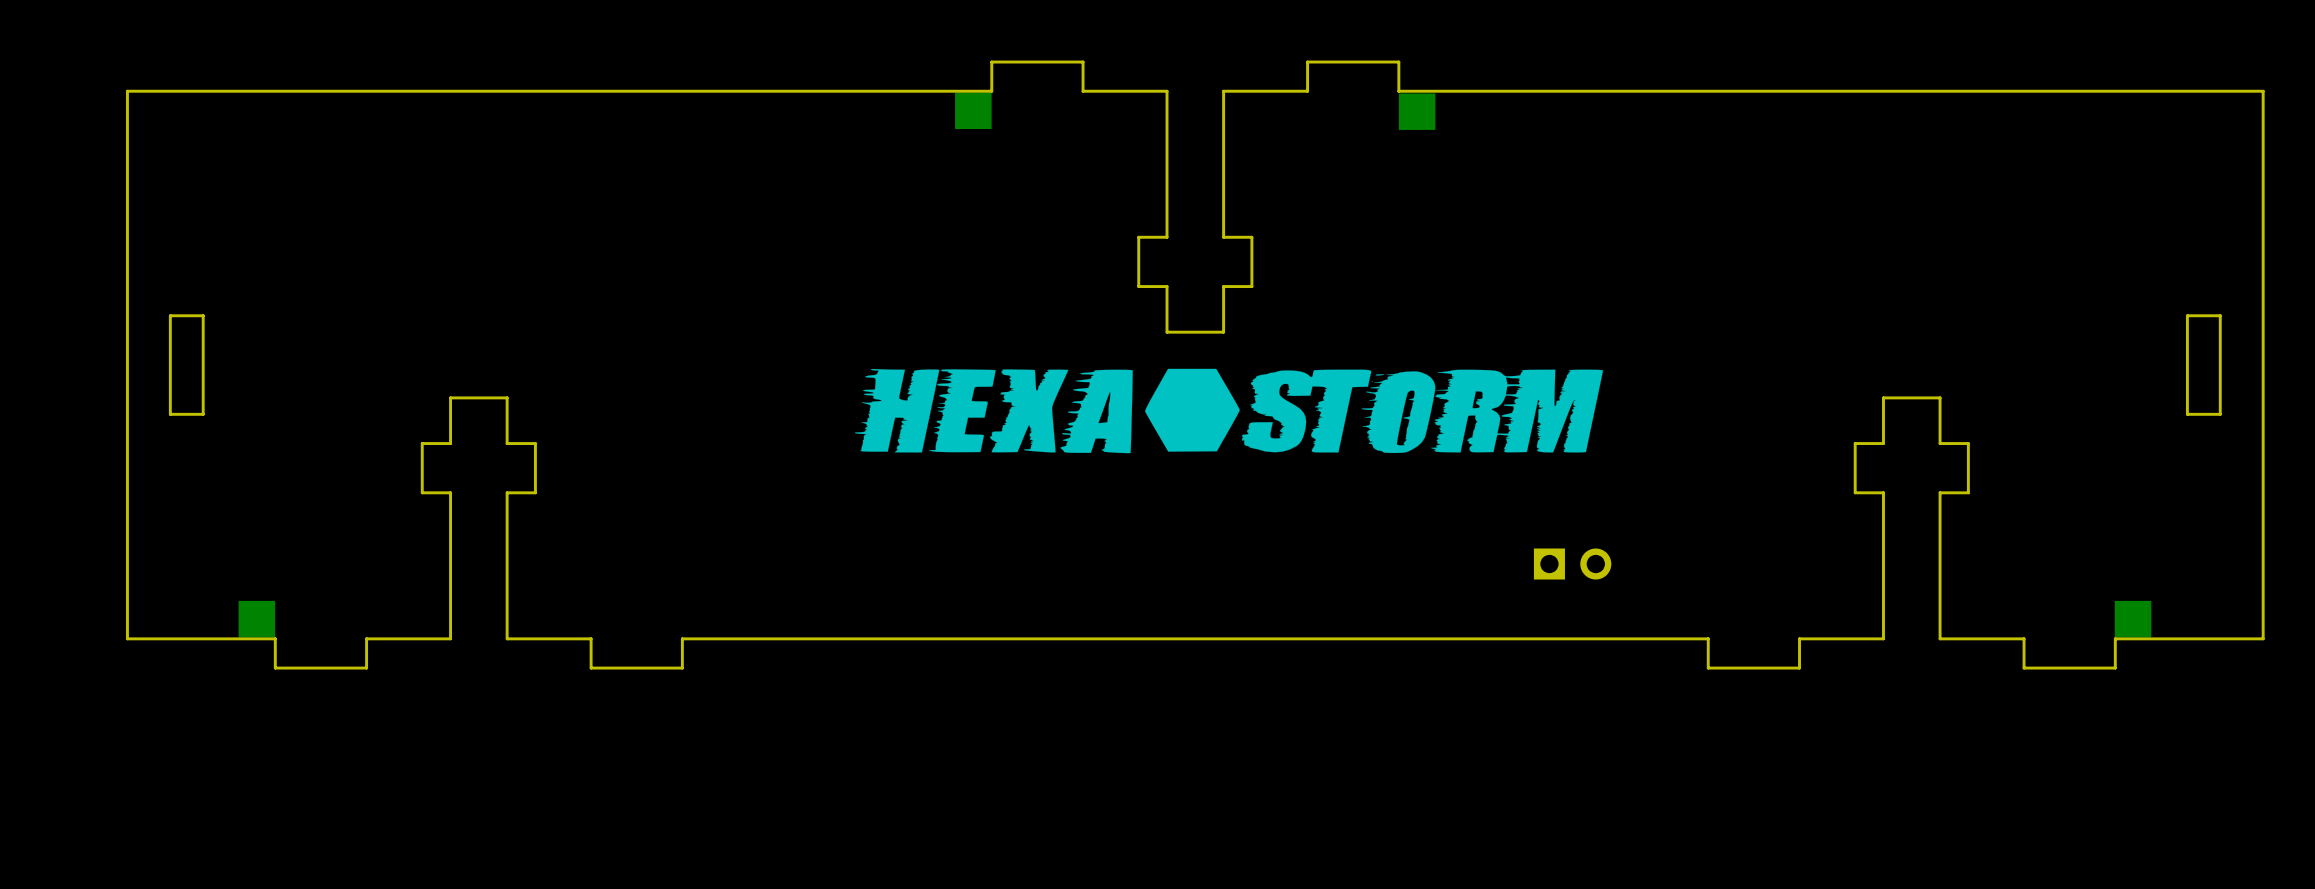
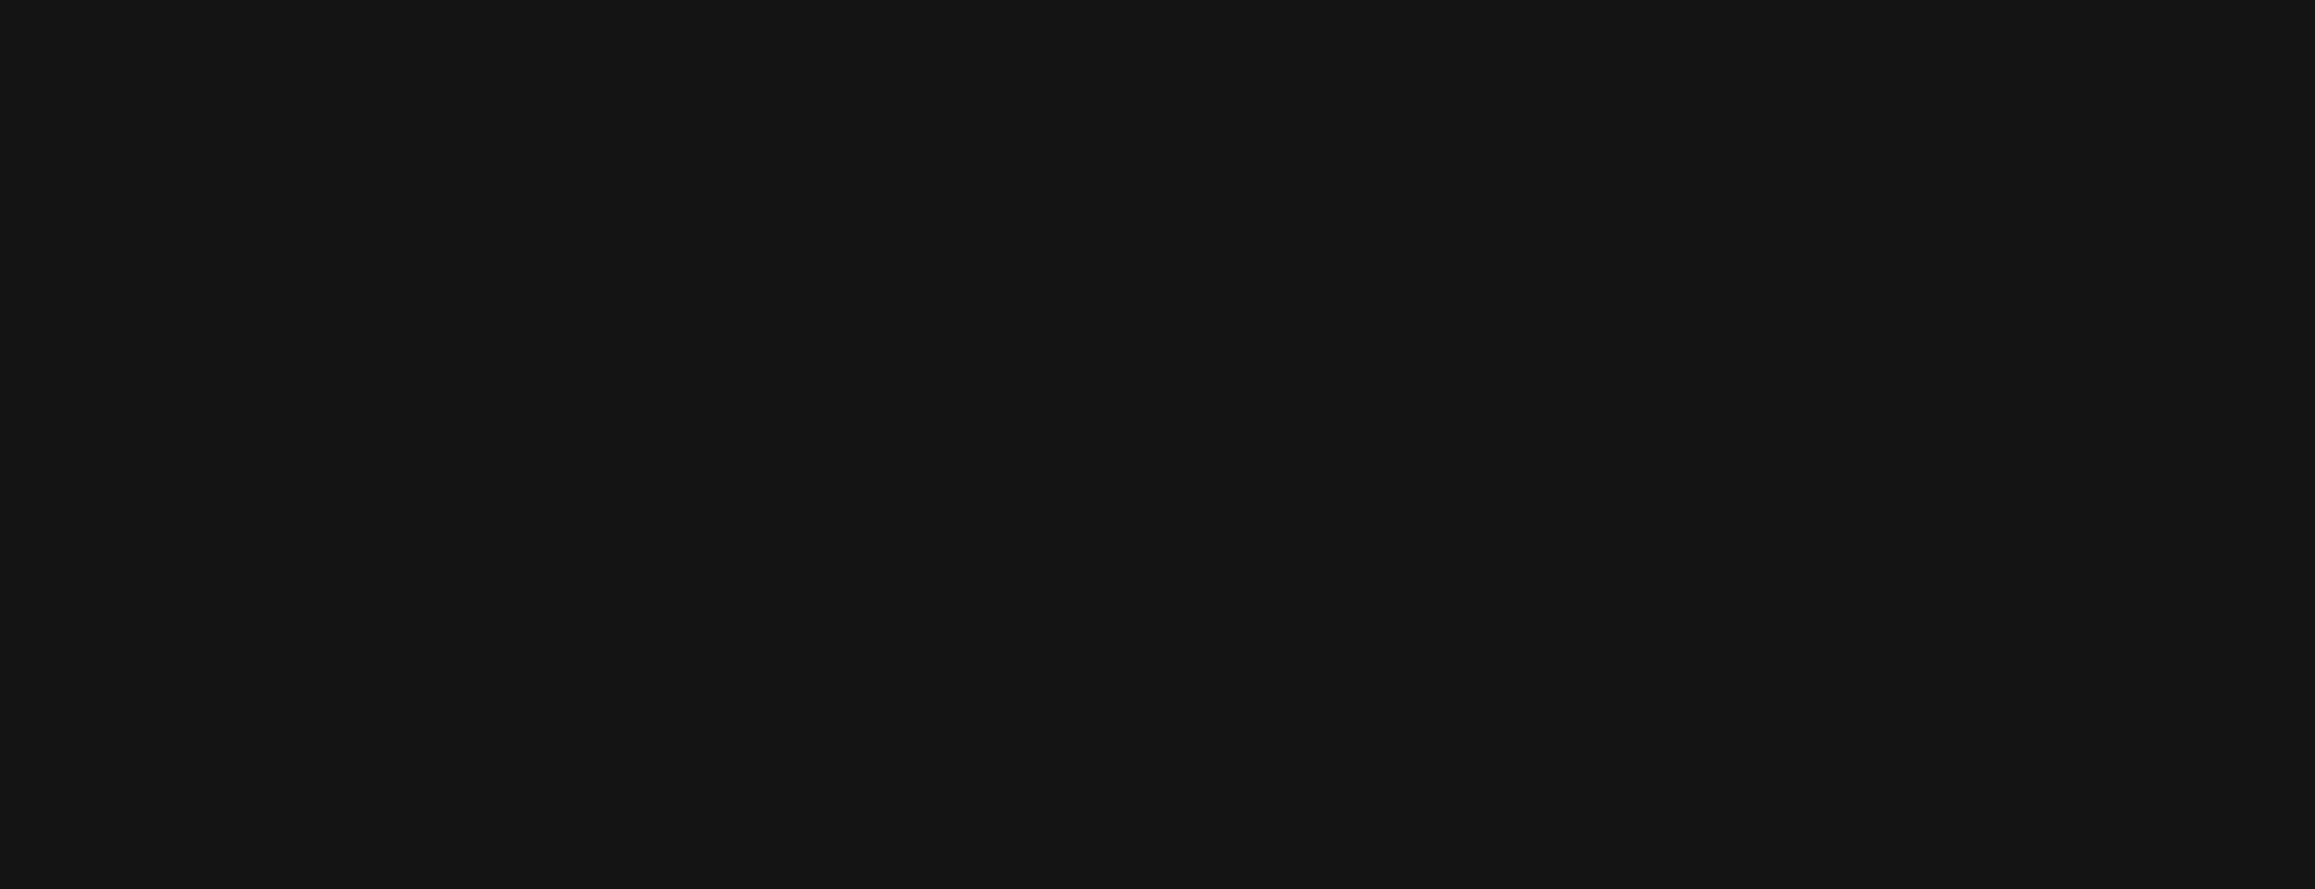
board edge: (1398, 62) (1398, 91) (2263, 91) (2263, 638) (2115, 638) (2115, 668) (2024, 668) (2024, 638) (1940, 638) (1940, 492) (1968, 492) (1968, 443) (1940, 443) (1940, 397) (1883, 397) (1883, 443) (1855, 443) (1855, 492) (1883, 492) (1883, 638) (1799, 638) (1799, 668) (1708, 668) (1708, 638) (682, 638) (682, 668) (591, 668) (591, 638) (507, 638) (507, 492) (535, 492) (535, 443) (507, 443) (507, 397) (450, 397) (450, 443) (422, 443) (422, 492) (450, 492) (450, 638) (366, 638) (366, 668) (275, 668) (275, 638) (127, 638) (127, 91) (991, 91) (991, 62) (1083, 62) (1083, 91) (1167, 91) (1167, 237) (1138, 237) (1138, 286) (1167, 286) (1167, 332) (1223, 332) (1223, 286) (1251, 286) (1251, 237) (1223, 237) (1223, 91) (1307, 91) (1307, 62) (1398, 62) -> none
part: (973, 110) -> none
part: (1417, 111) -> none
board edge: (203, 315) (170, 315) (170, 414) (203, 414) (203, 315) -> none
board edge: (2220, 315) (2187, 315) (2187, 414) (2220, 414) (2220, 315) -> none
drawing: [854, 368, 1604, 454] -> none
part: (1572, 564) -> none
part: (256, 619) -> none
part: (2133, 619) -> none

